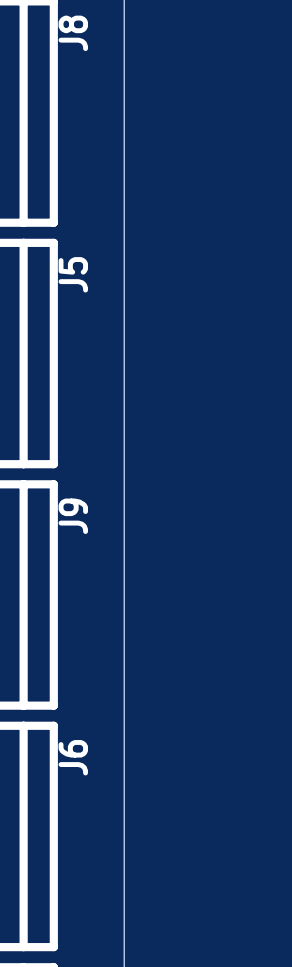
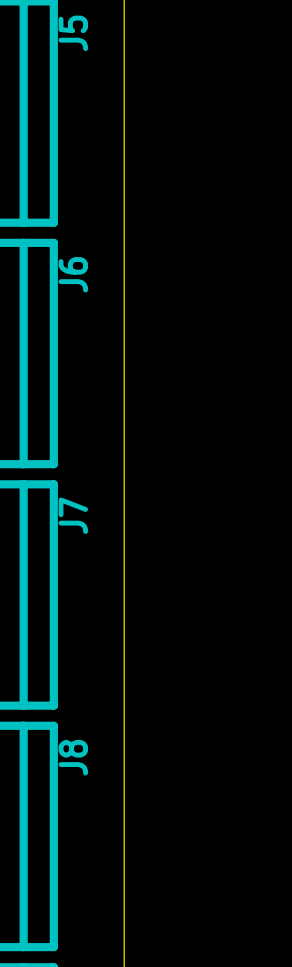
J8 name: J8 (73, 33) -> J5 (73, 33)
J5 name: J5 (73, 274) -> J6 (73, 274)
J9 name: J9 (73, 516) -> J7 (73, 515)
J6 name: J6 (73, 757) -> J8 (73, 757)

